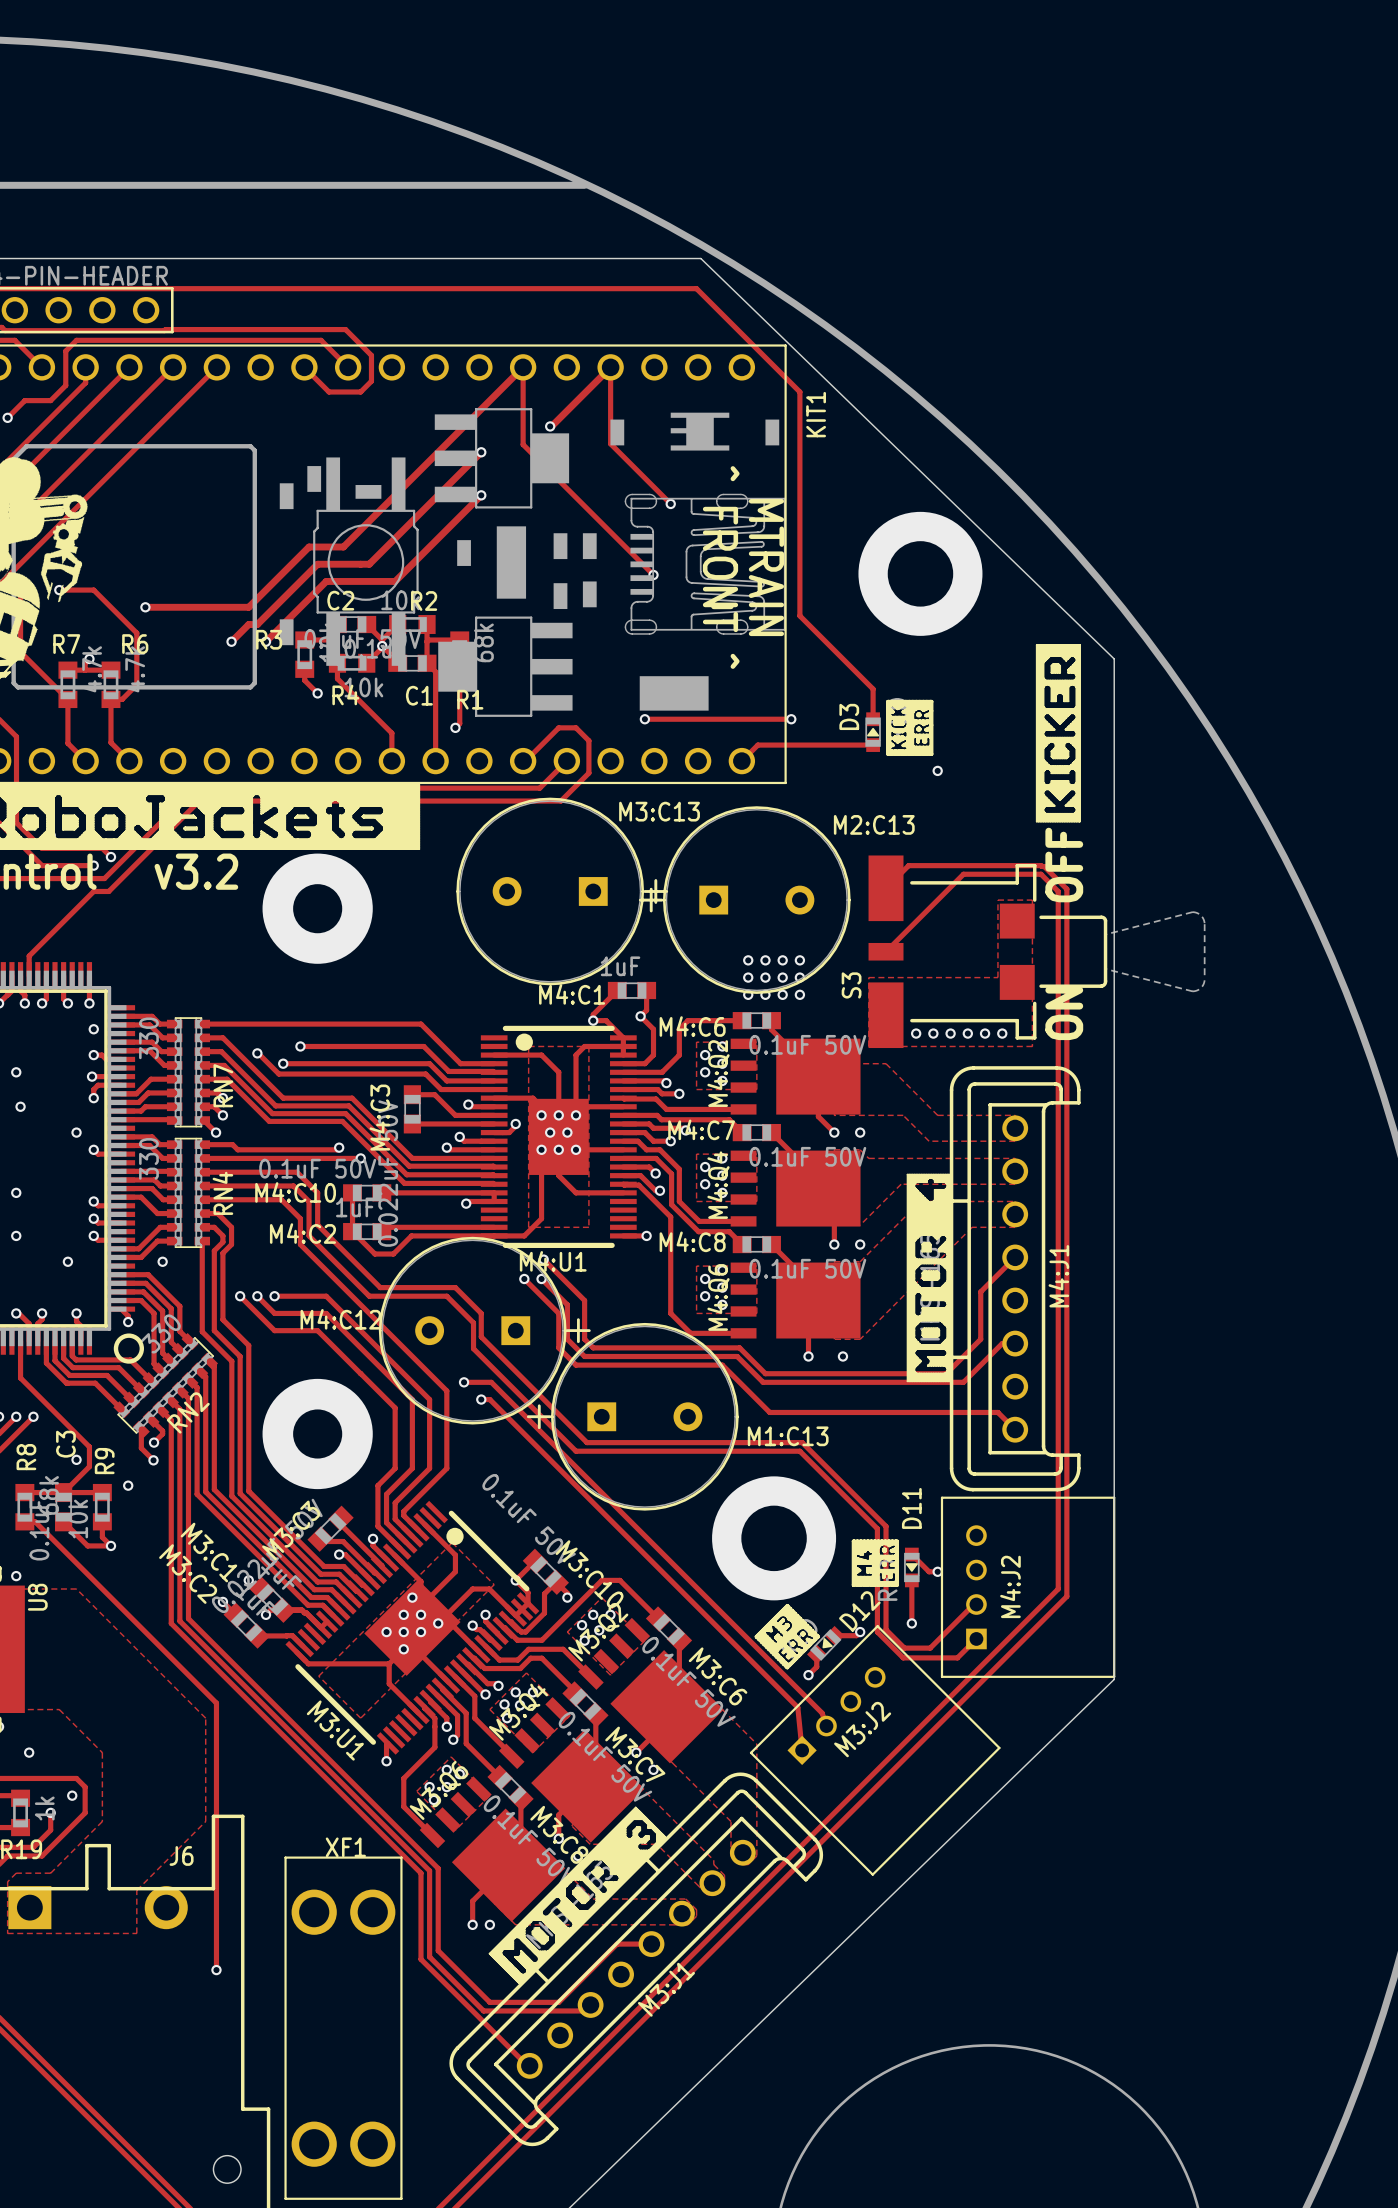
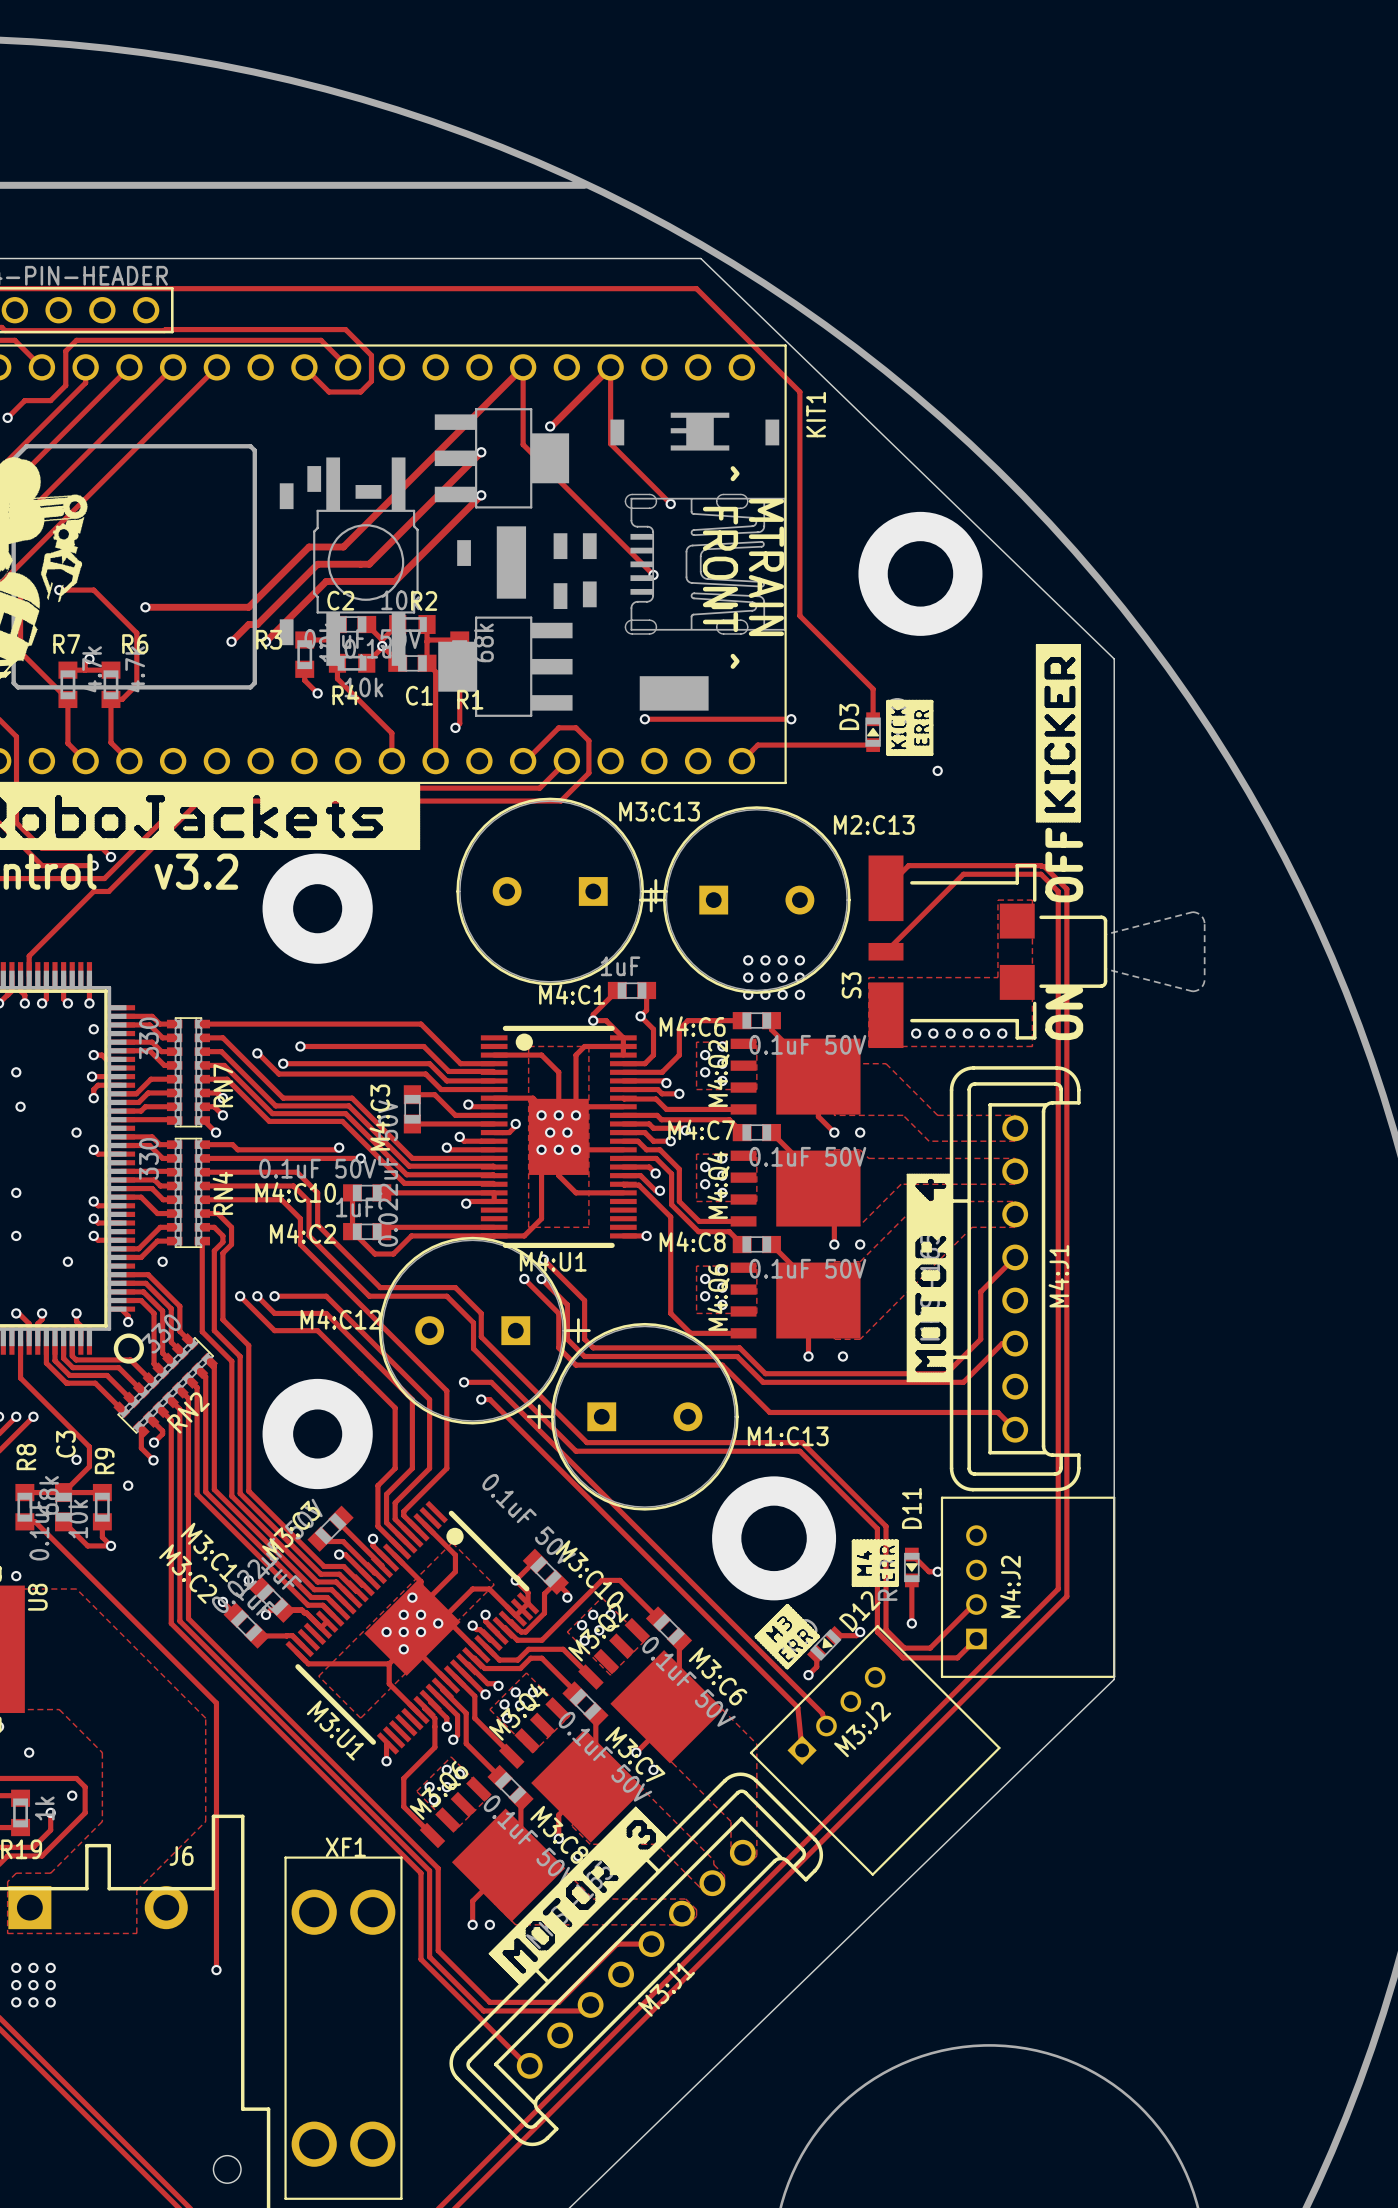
via: none -> (16, 1967)
via: none -> (33, 1967)
via: none -> (50, 1967)
via: none -> (16, 1985)
via: none -> (33, 1985)
via: none -> (50, 1985)
via: none -> (16, 2002)
via: none -> (33, 2002)
via: none -> (50, 2002)

